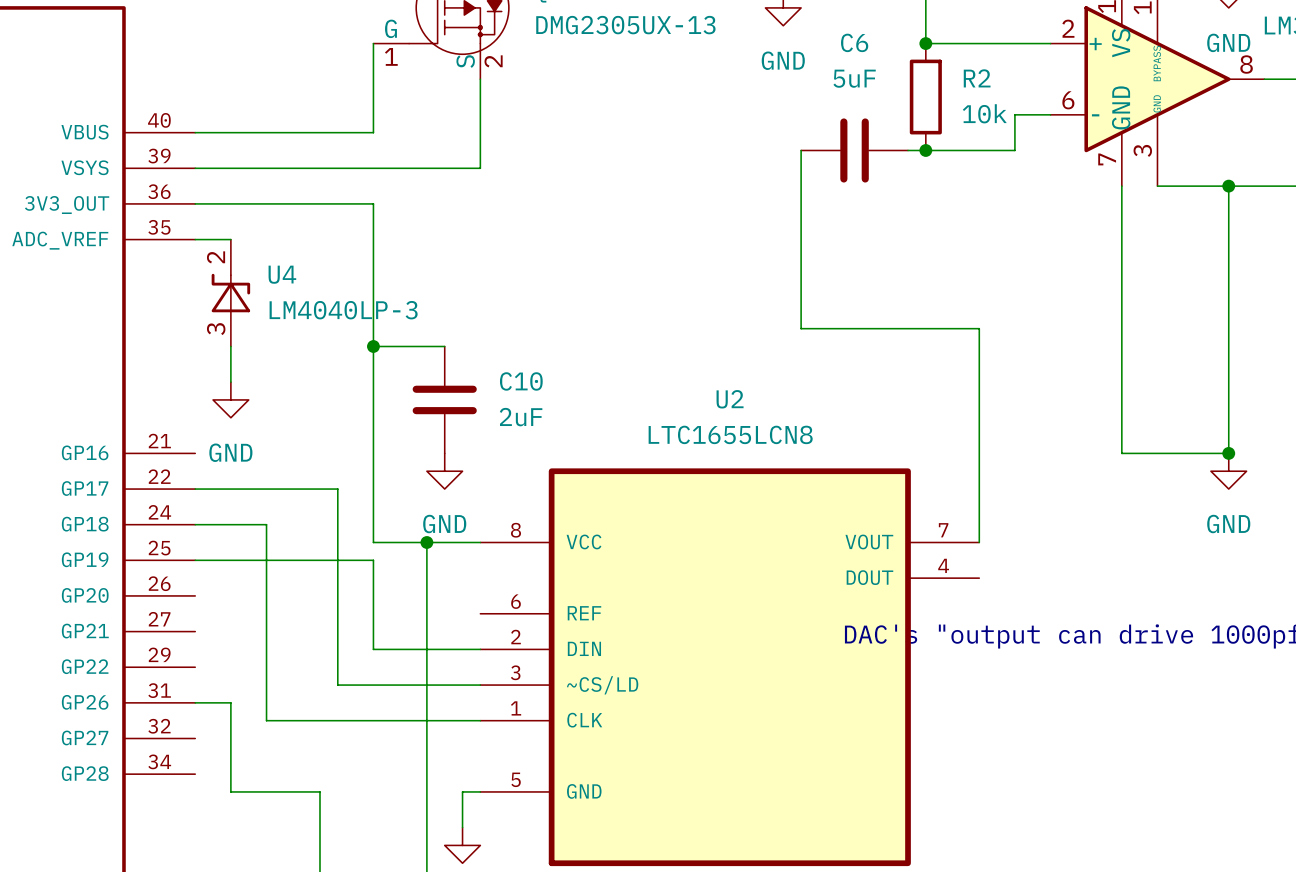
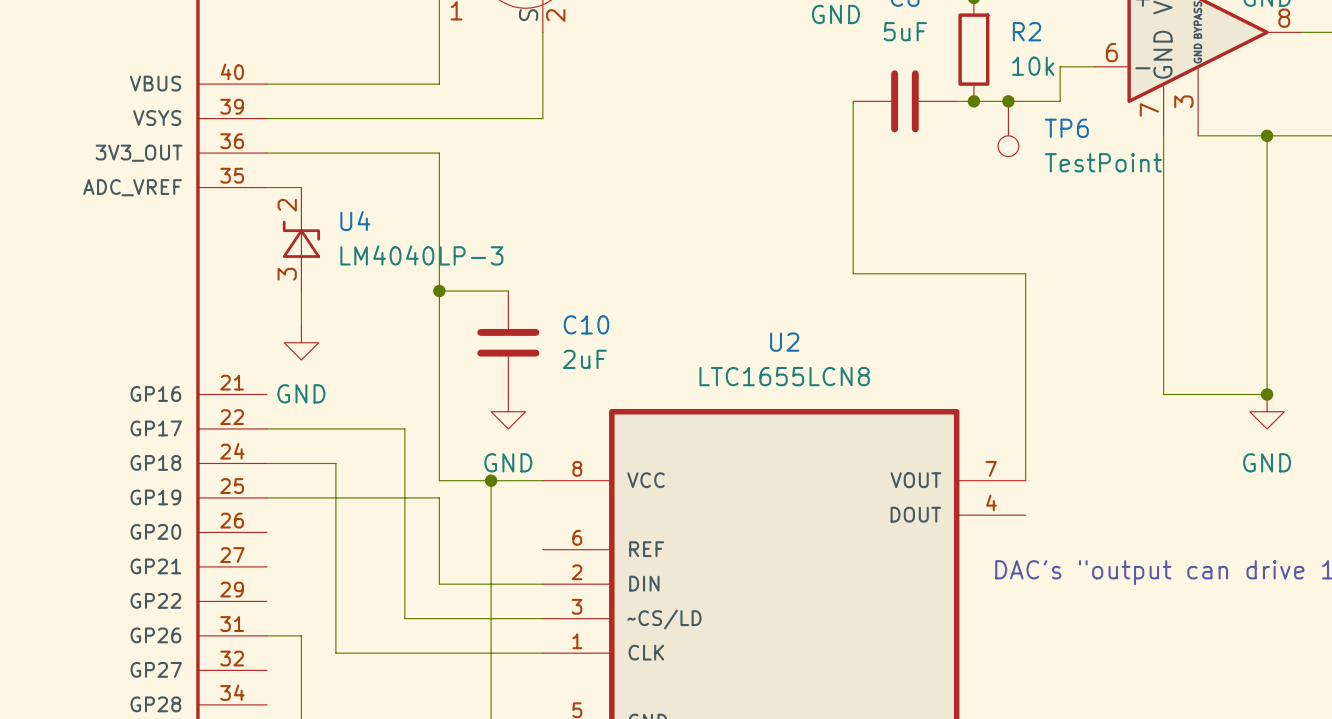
junction: none -> (1008, 101)
TP6: none -> TestPoint (1008, 128)

